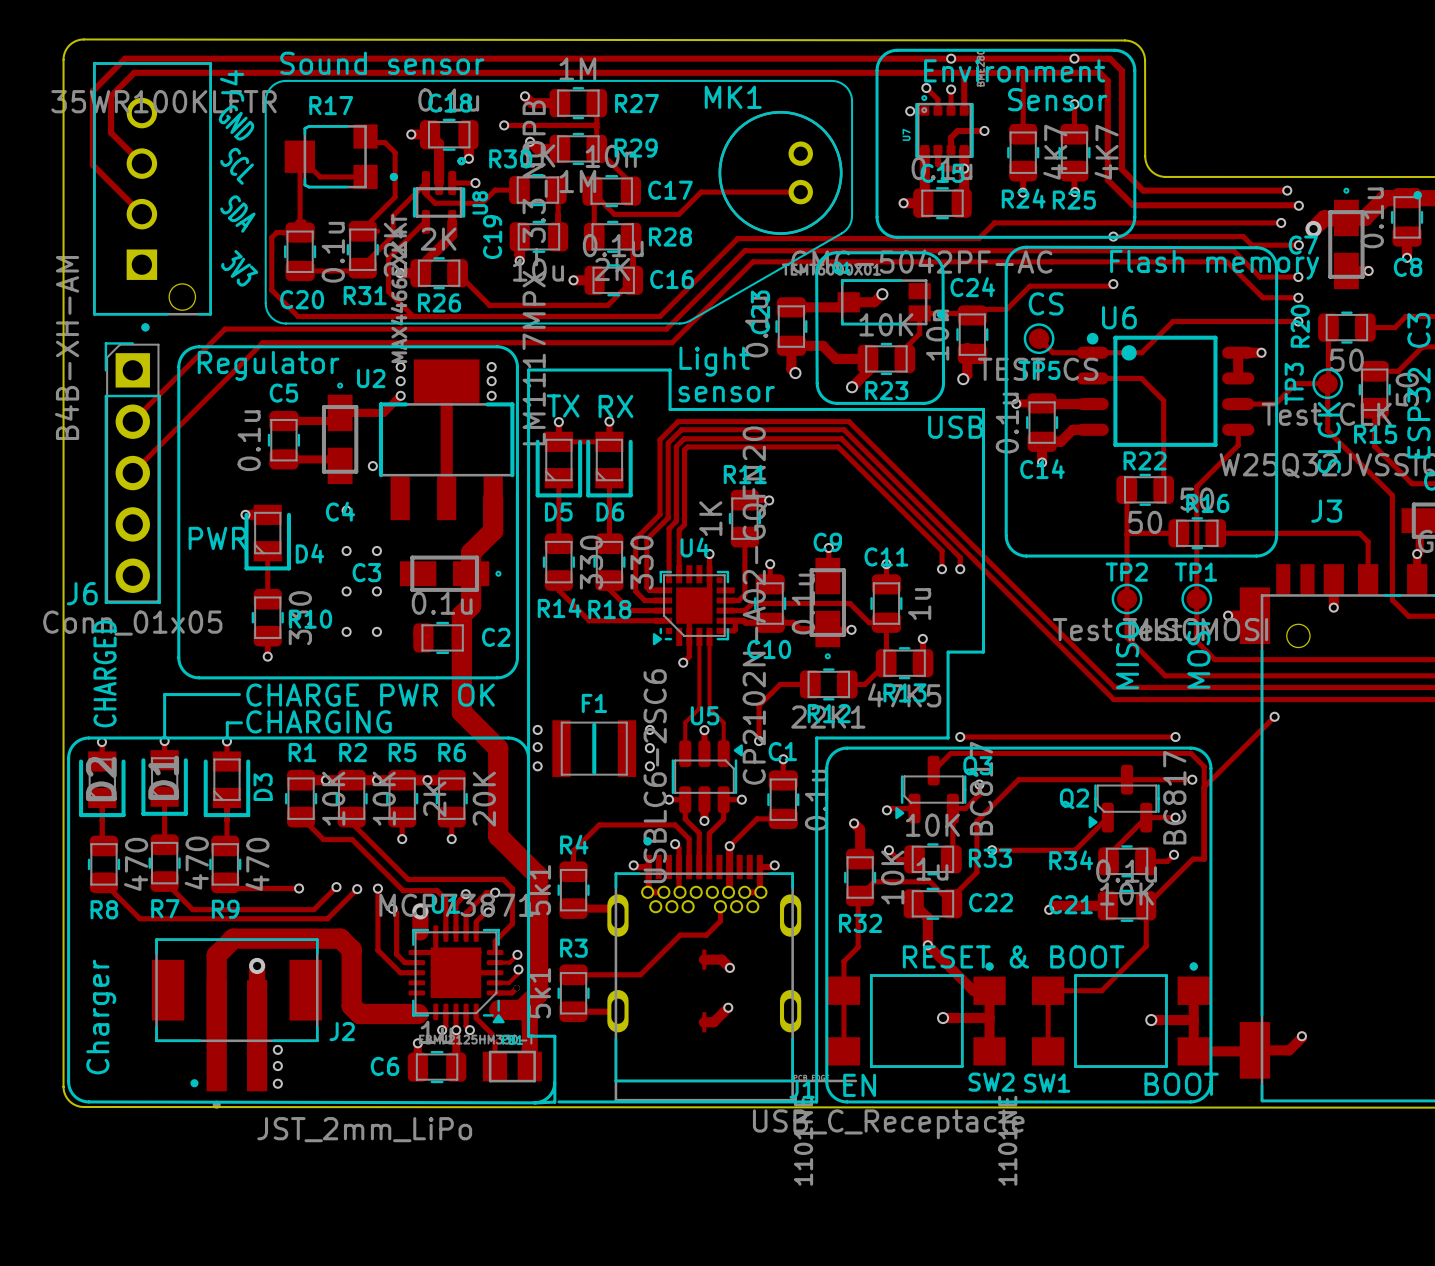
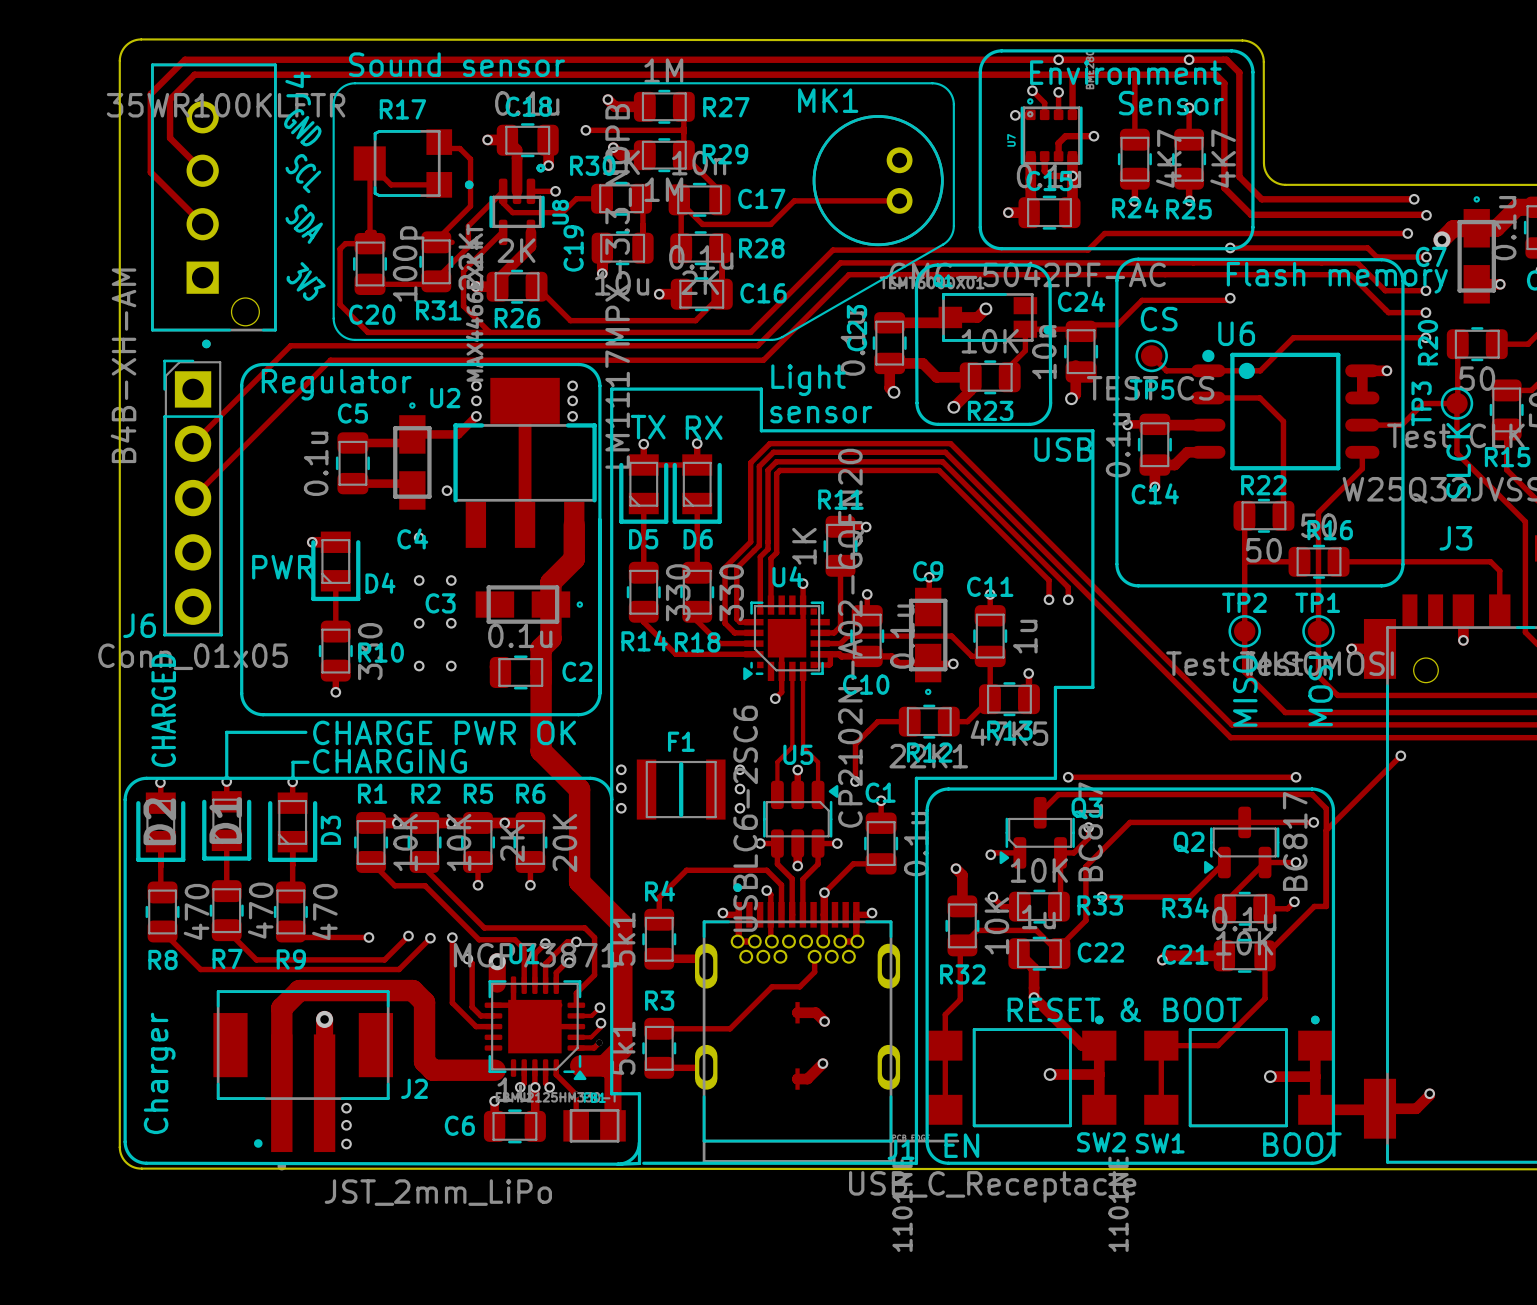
C20 value: 0.1u (333, 252) -> 100p (408, 263)

